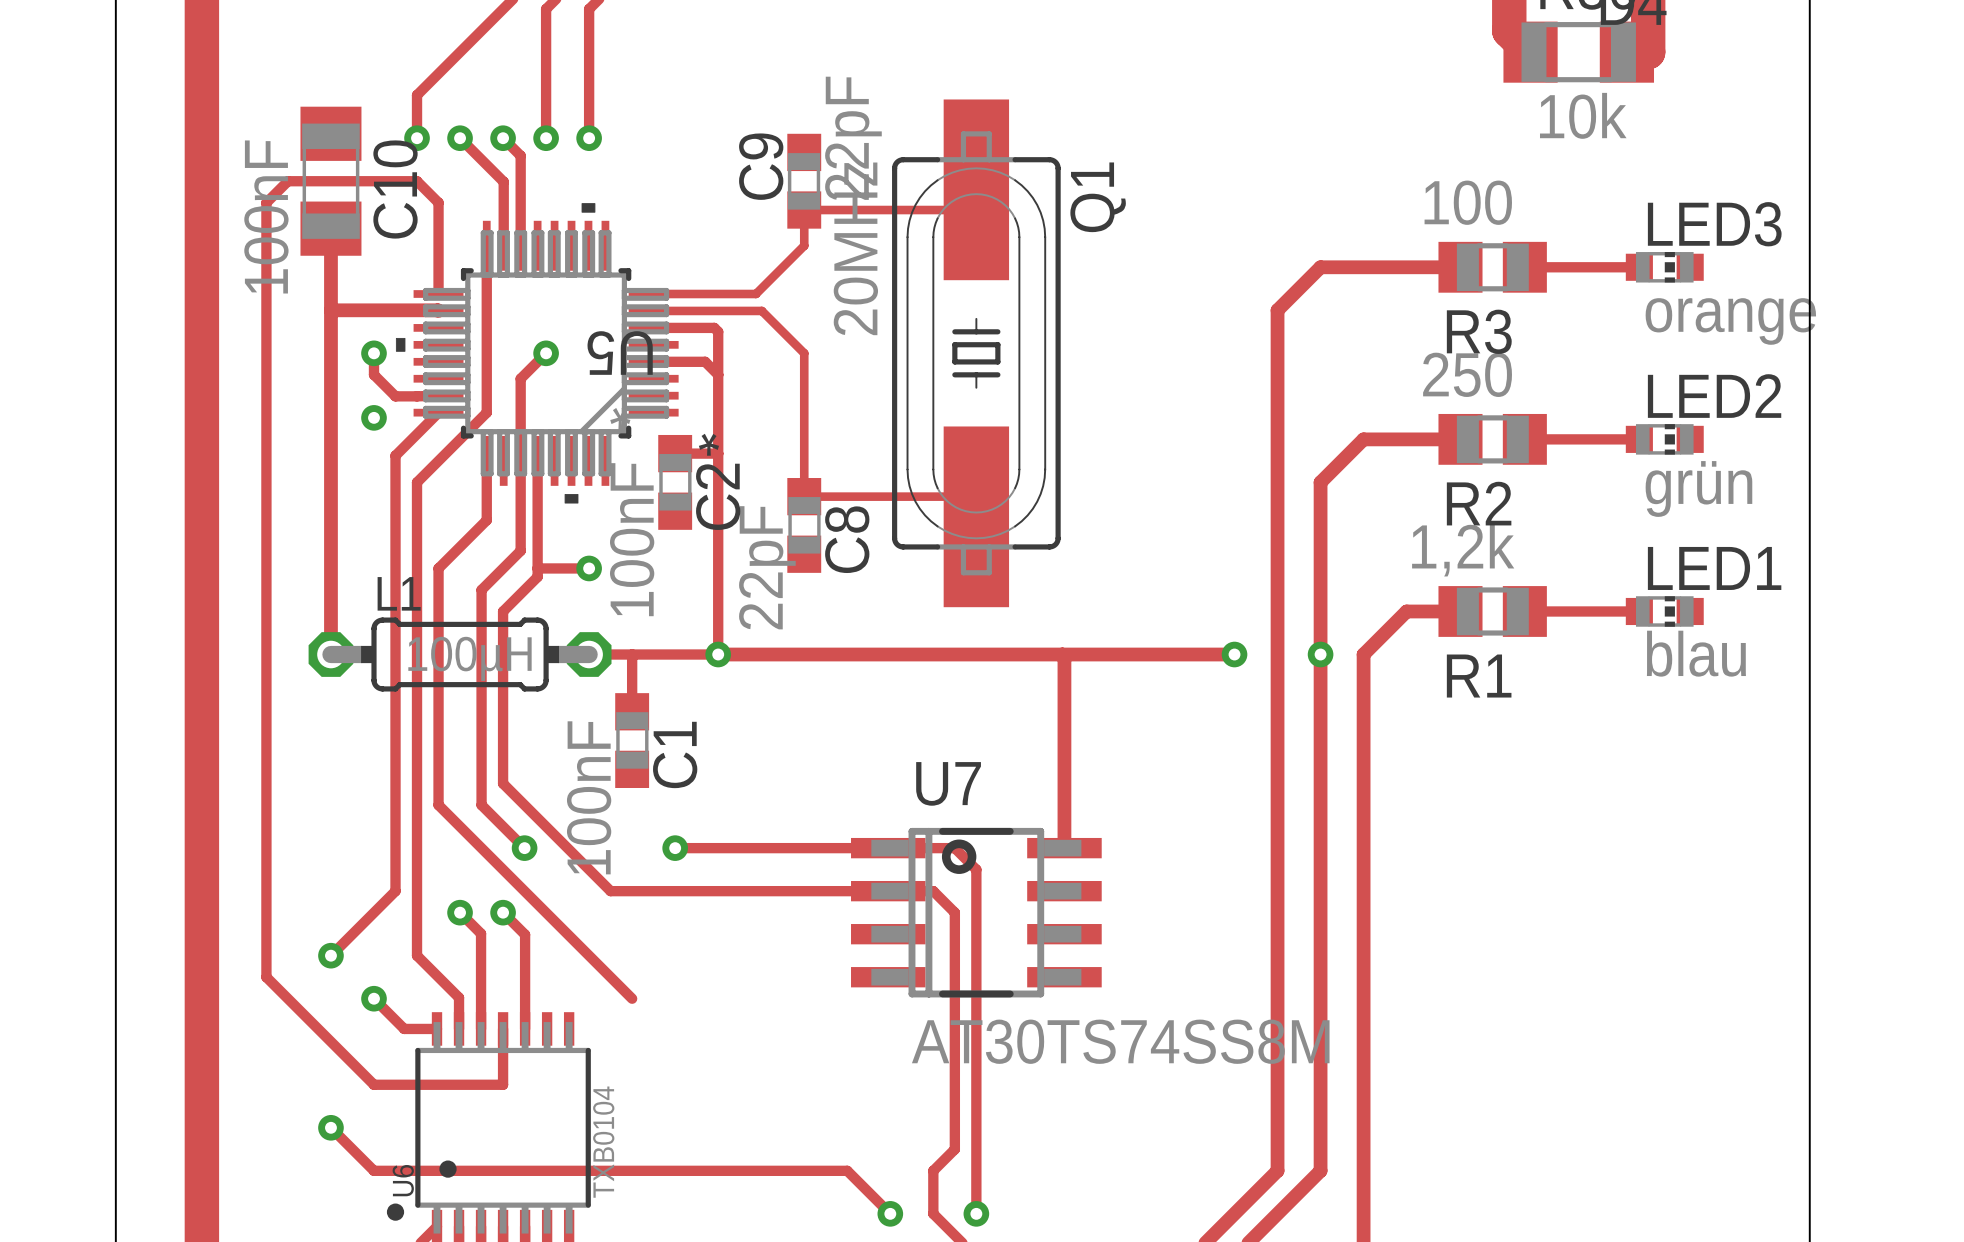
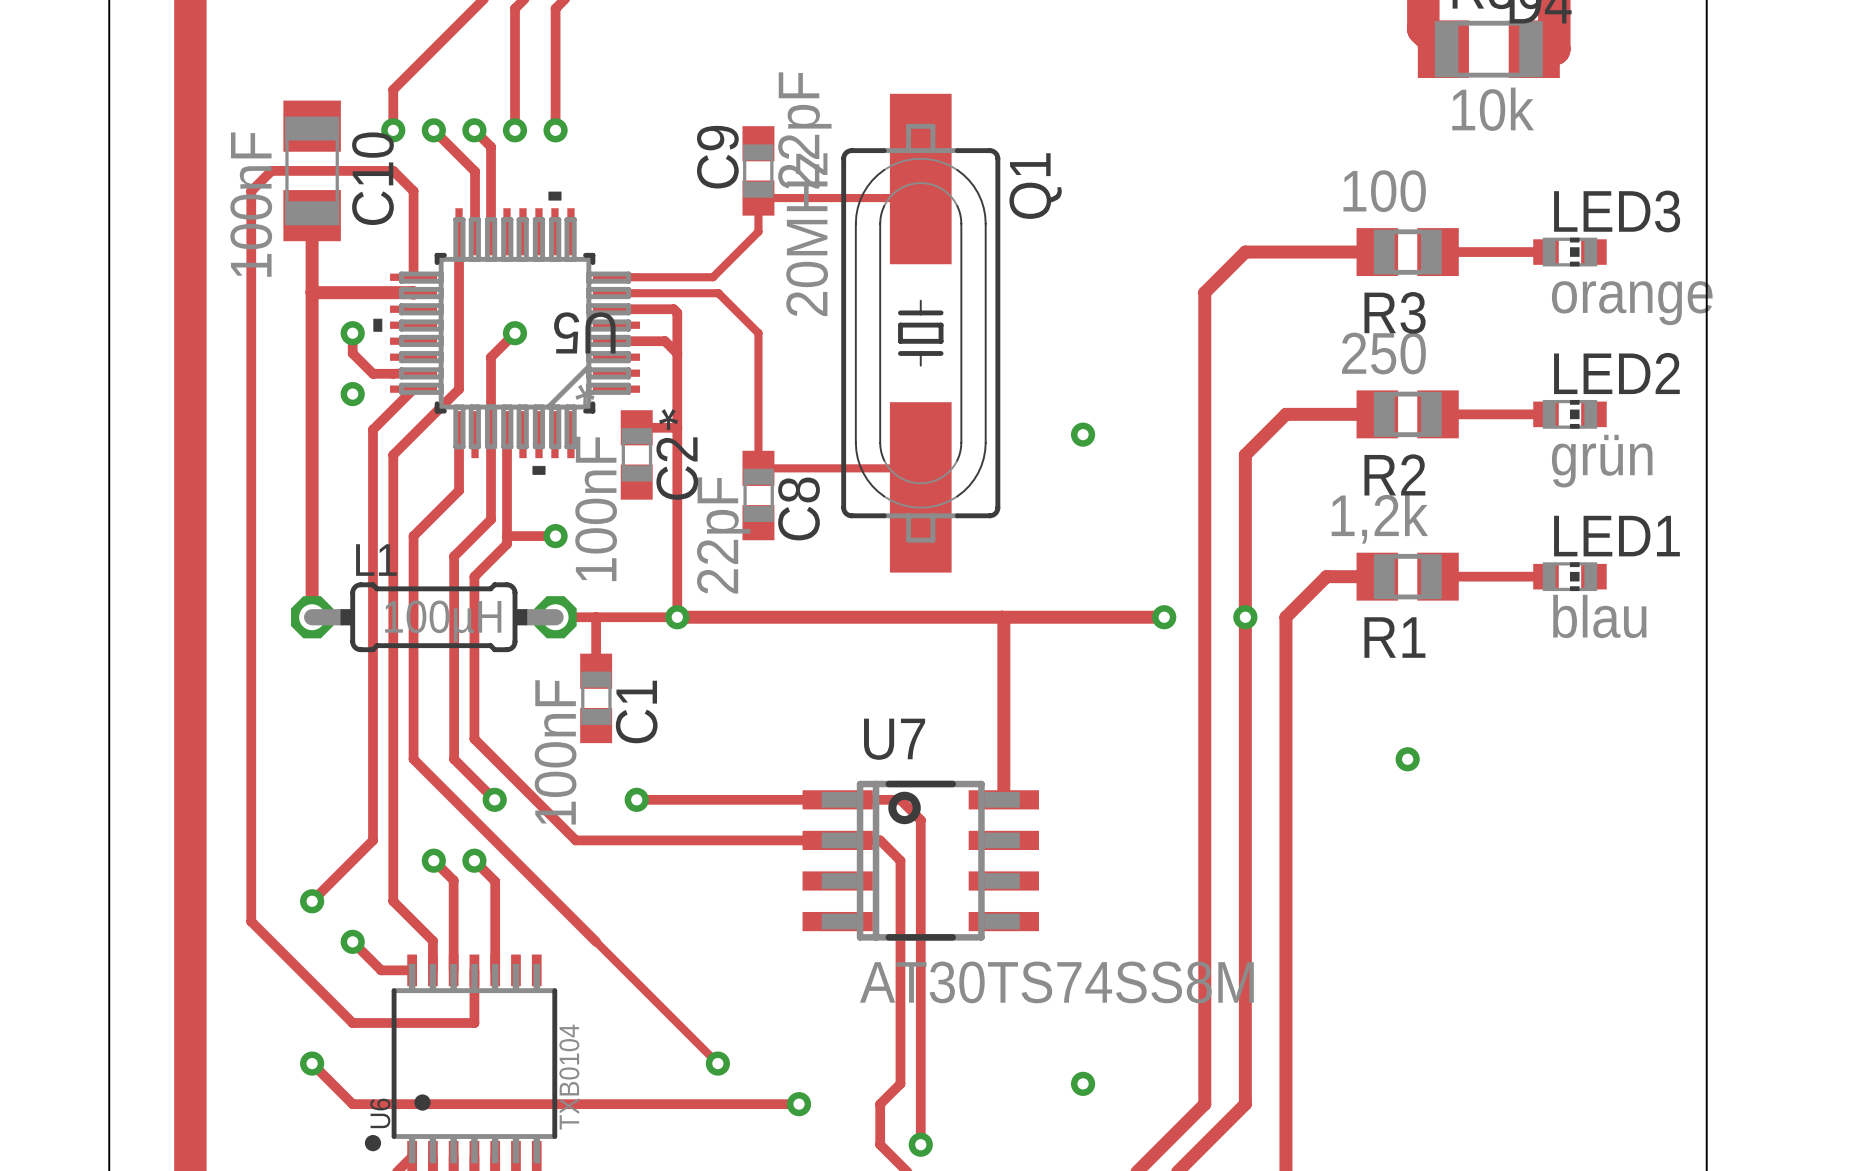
via: none -> (1083, 434)
via: none -> (1407, 759)
track: none -> (596, 941) (717, 1063)
via: none -> (717, 1063)
via: none -> (1083, 1083)
track: (847, 1170) (890, 1213) -> none
via: none -> (799, 1104)
via: (890, 1213) -> none

